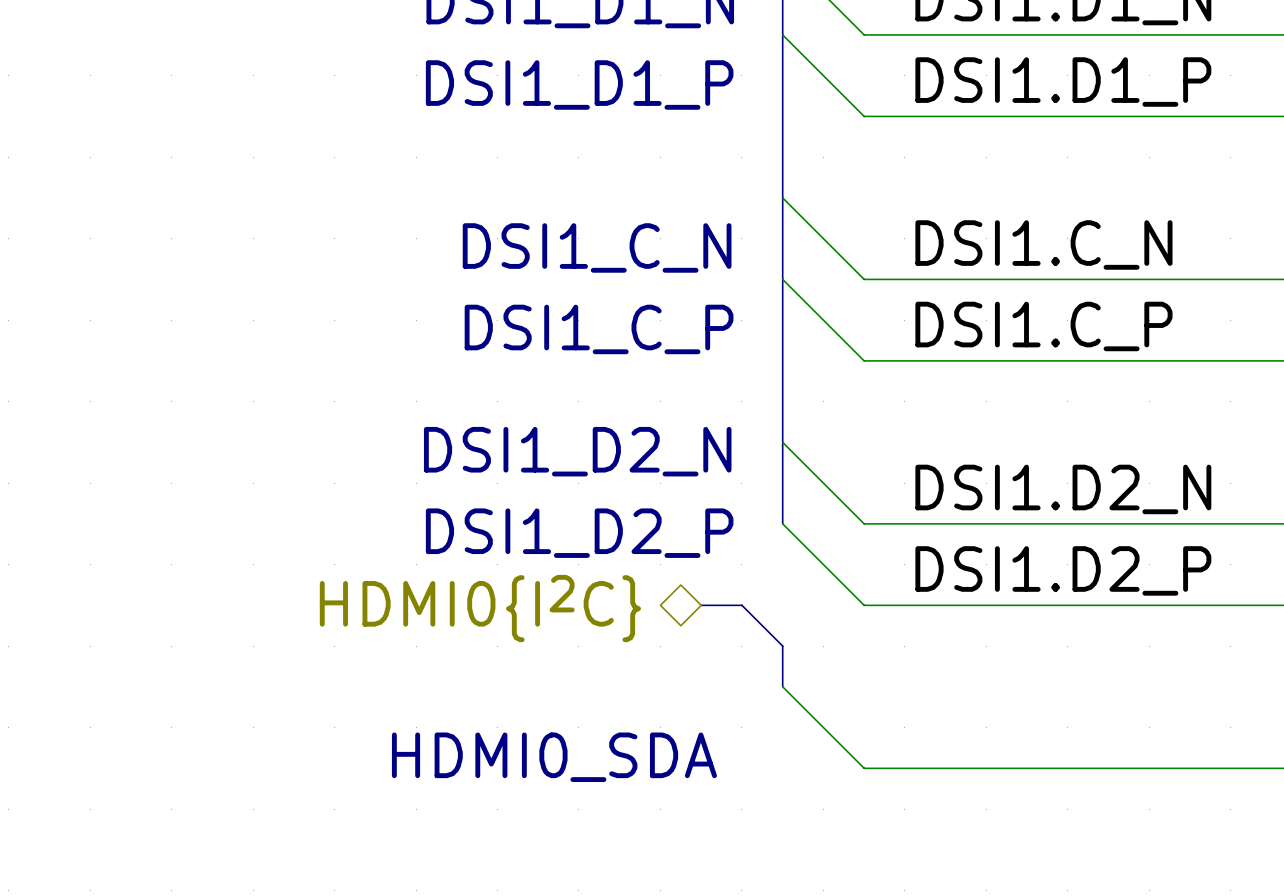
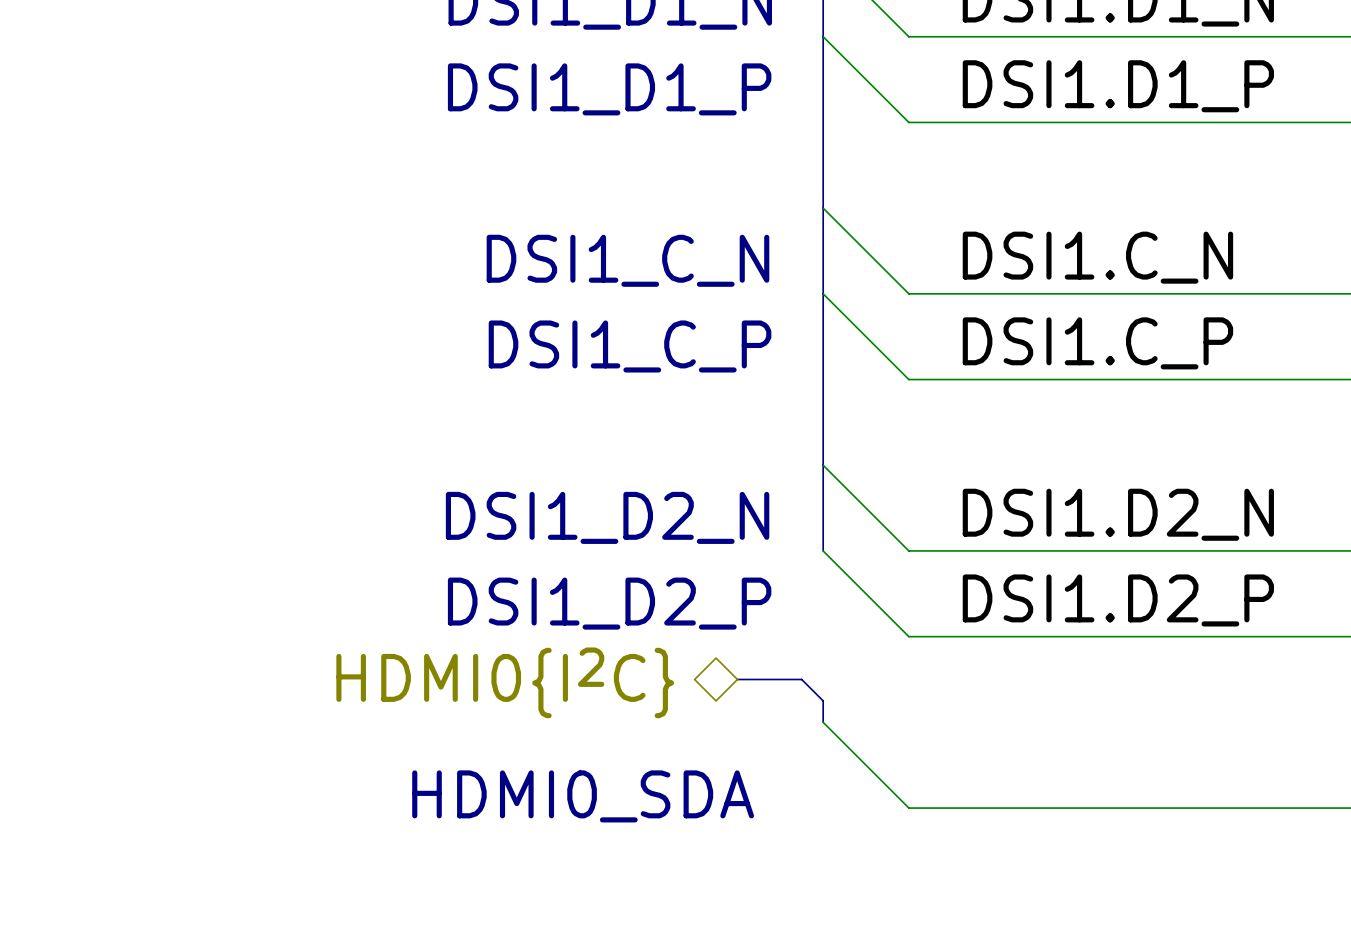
text position: DSI1_D2_N (577, 451) -> DSI1_D2_N (607, 517)
text position: DSI1_D2_P (579, 533) -> DSI1_D2_P (609, 603)
bus: (701, 605) (741, 605) (782, 646) (782, 666) -> (737, 679) (801, 679) (823, 700)
hierarchical label position: HDMI0{I2C} (480, 608) -> HDMI0{I2C} (505, 682)

